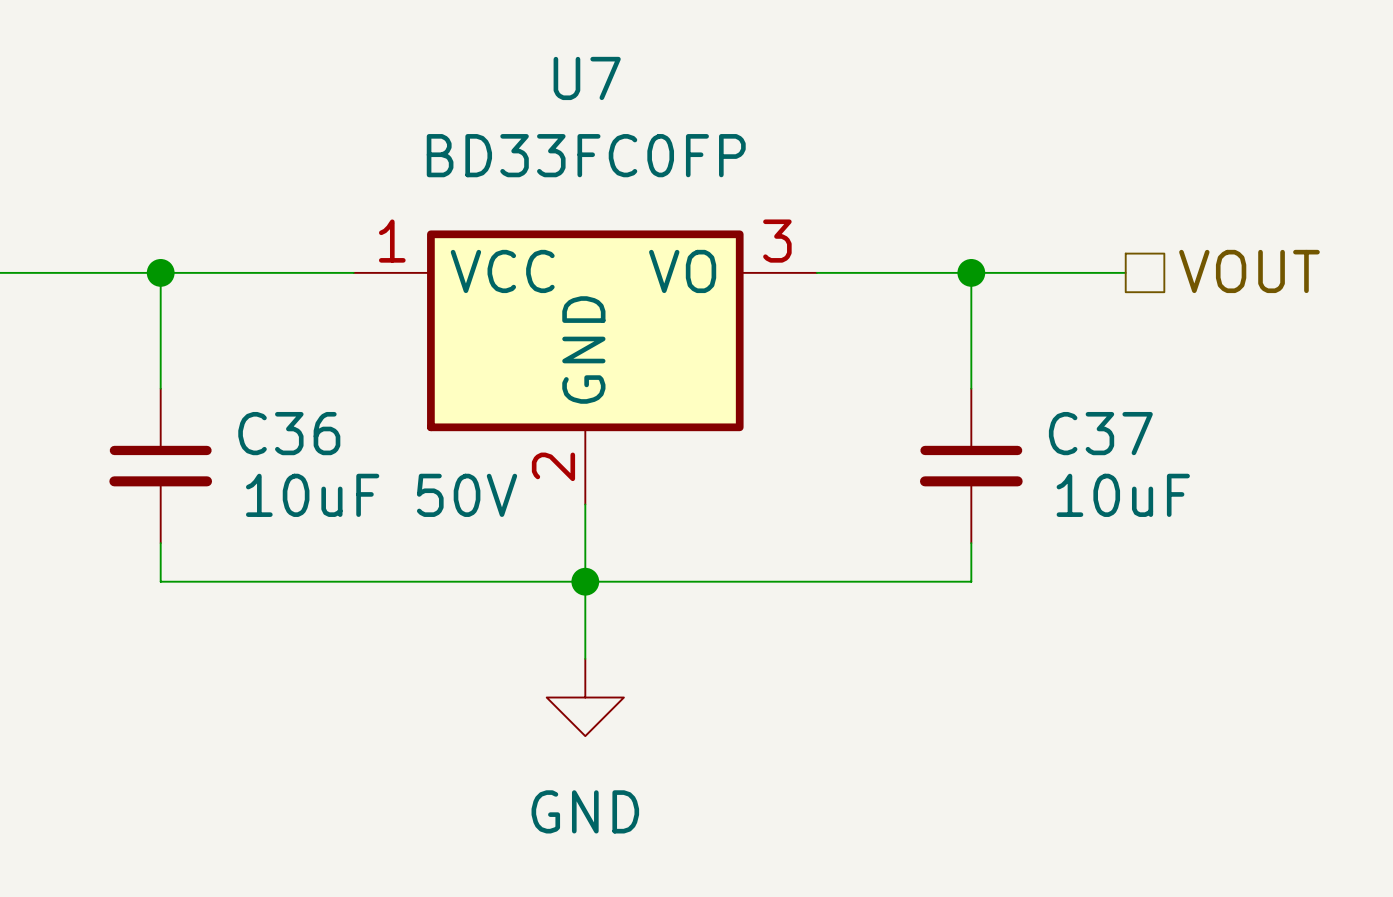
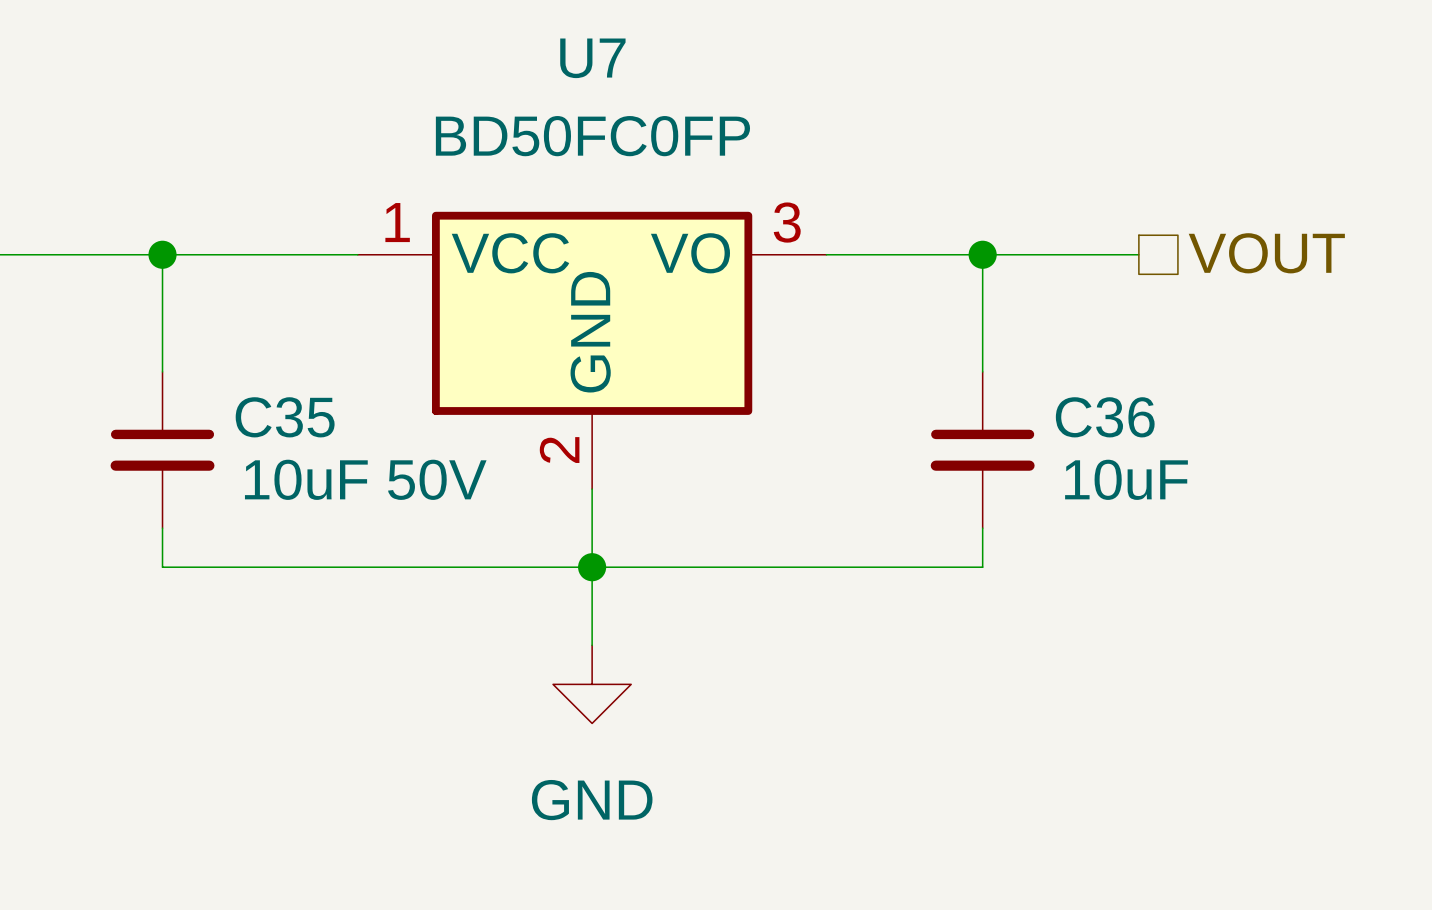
U7 value: BD33FC0FP (586, 155) -> BD50FC0FP (592, 136)
C36 name: C36 (289, 433) -> C35 (285, 417)
C37 name: C37 (1100, 433) -> C36 (1105, 417)

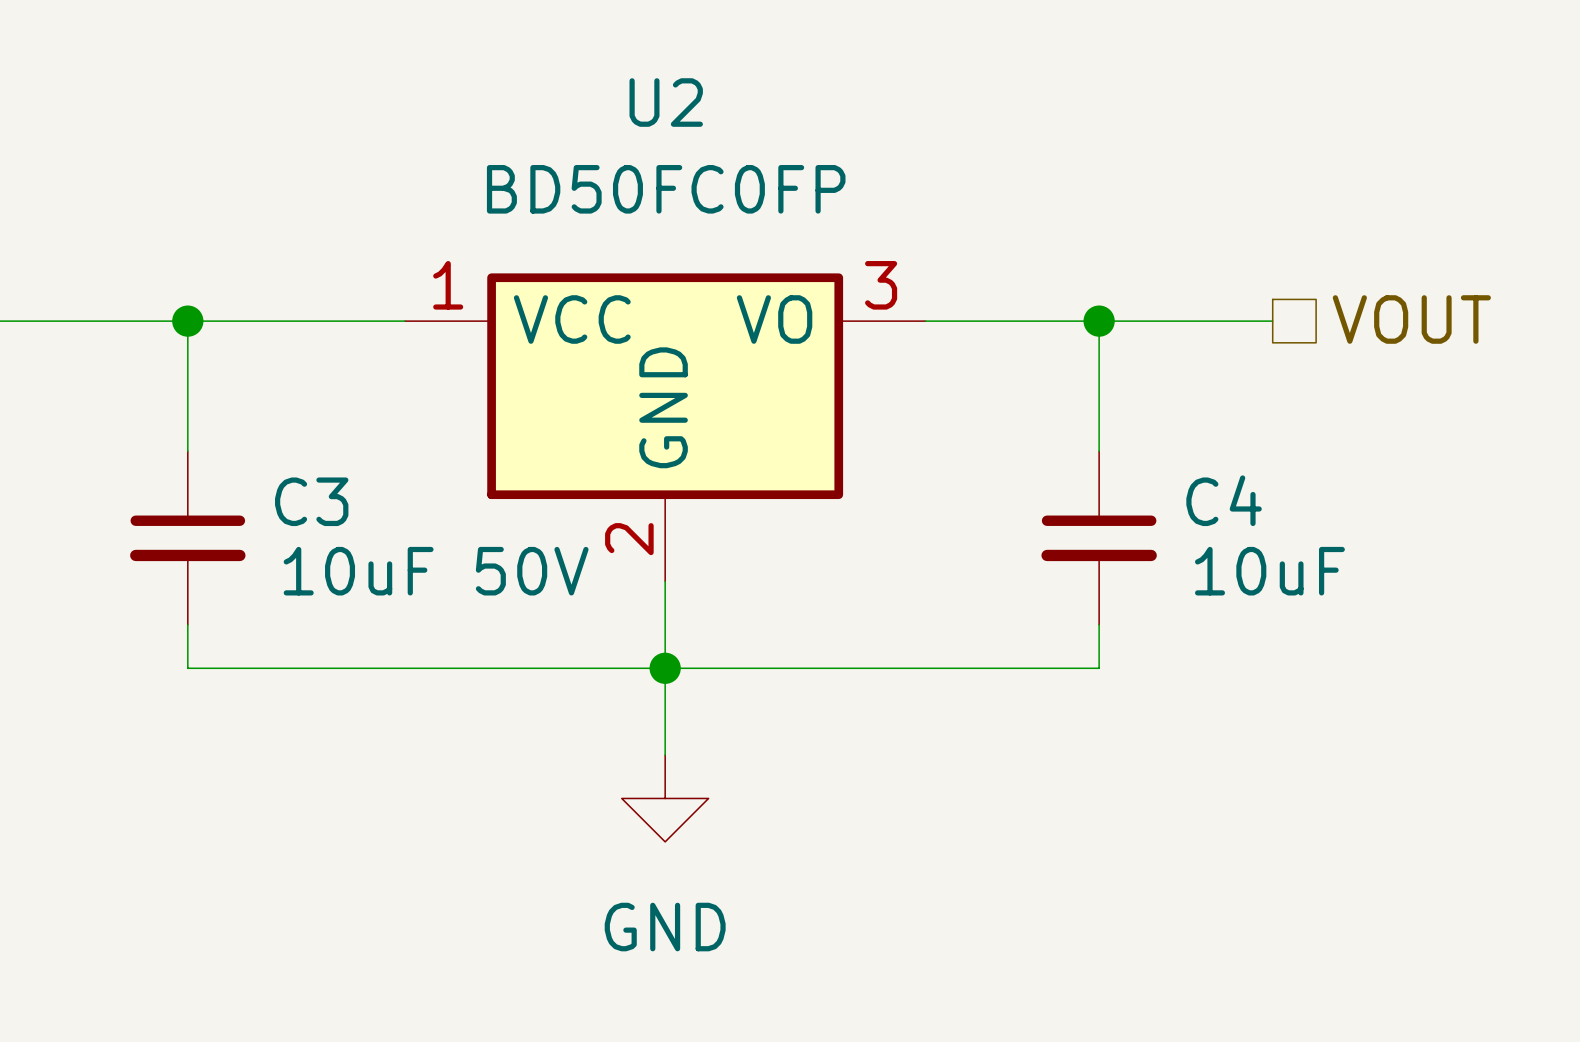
U7 name: U7 (592, 58) -> U2 (666, 102)
C35 name: C35 (285, 417) -> C3 (311, 501)
C36 name: C36 (1105, 417) -> C4 (1224, 500)

